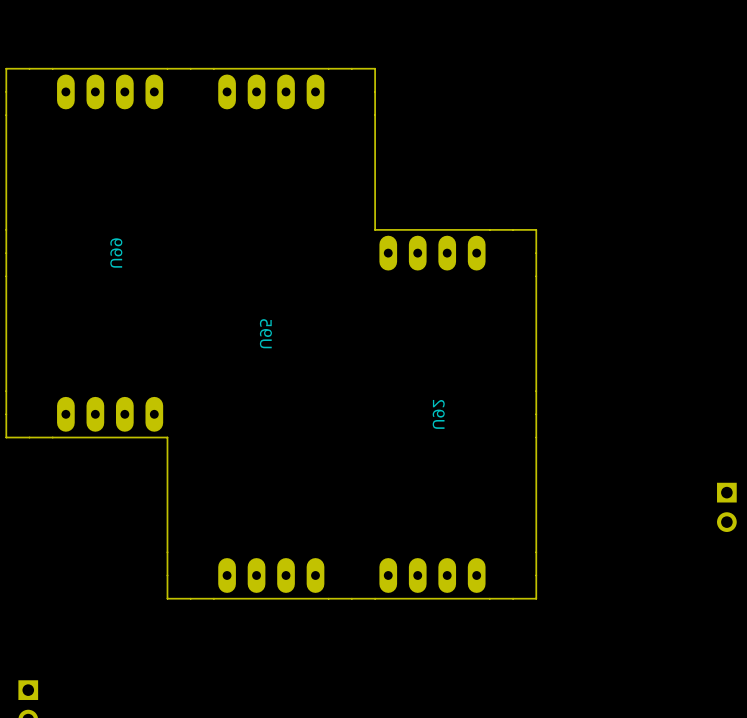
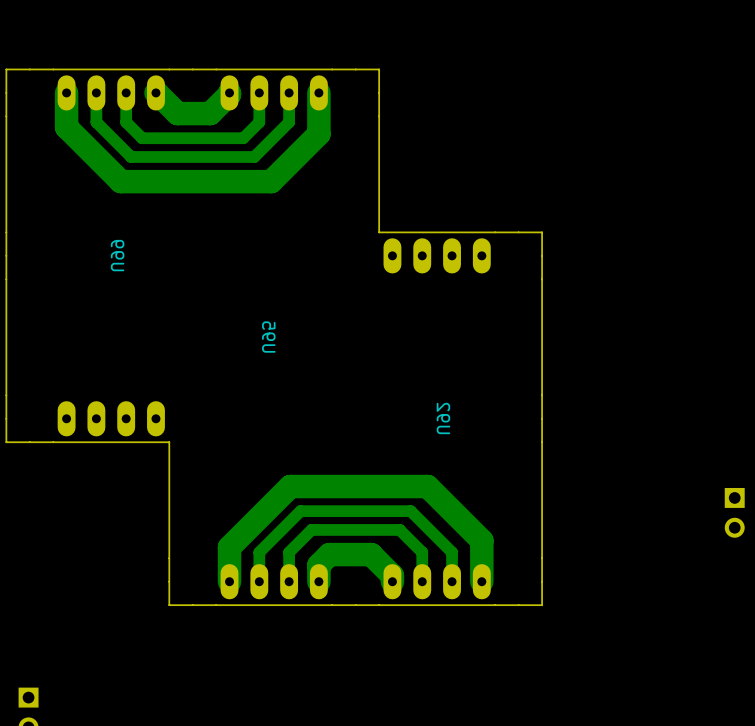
bottom track: none -> (229, 92) (210, 113) (177, 113) (155, 92)
bottom track: none -> (259, 92) (259, 122) (243, 138) (142, 138) (126, 122) (126, 92)
bottom track: none -> (289, 92) (289, 122) (254, 156) (131, 156) (96, 122) (96, 92)
bottom track: none -> (318, 92) (318, 133) (271, 181) (120, 181) (66, 127) (66, 92)
bottom track: none -> (392, 581) (392, 575) (371, 554) (329, 554) (318, 565) (318, 581)
bottom track: none -> (422, 581) (422, 552) (399, 529) (311, 529) (289, 552) (289, 581)
bottom track: none -> (452, 581) (452, 552) (410, 511) (300, 511) (259, 552) (259, 581)
bottom track: none -> (481, 581) (481, 540) (427, 486) (290, 486) (229, 547) (229, 581)

